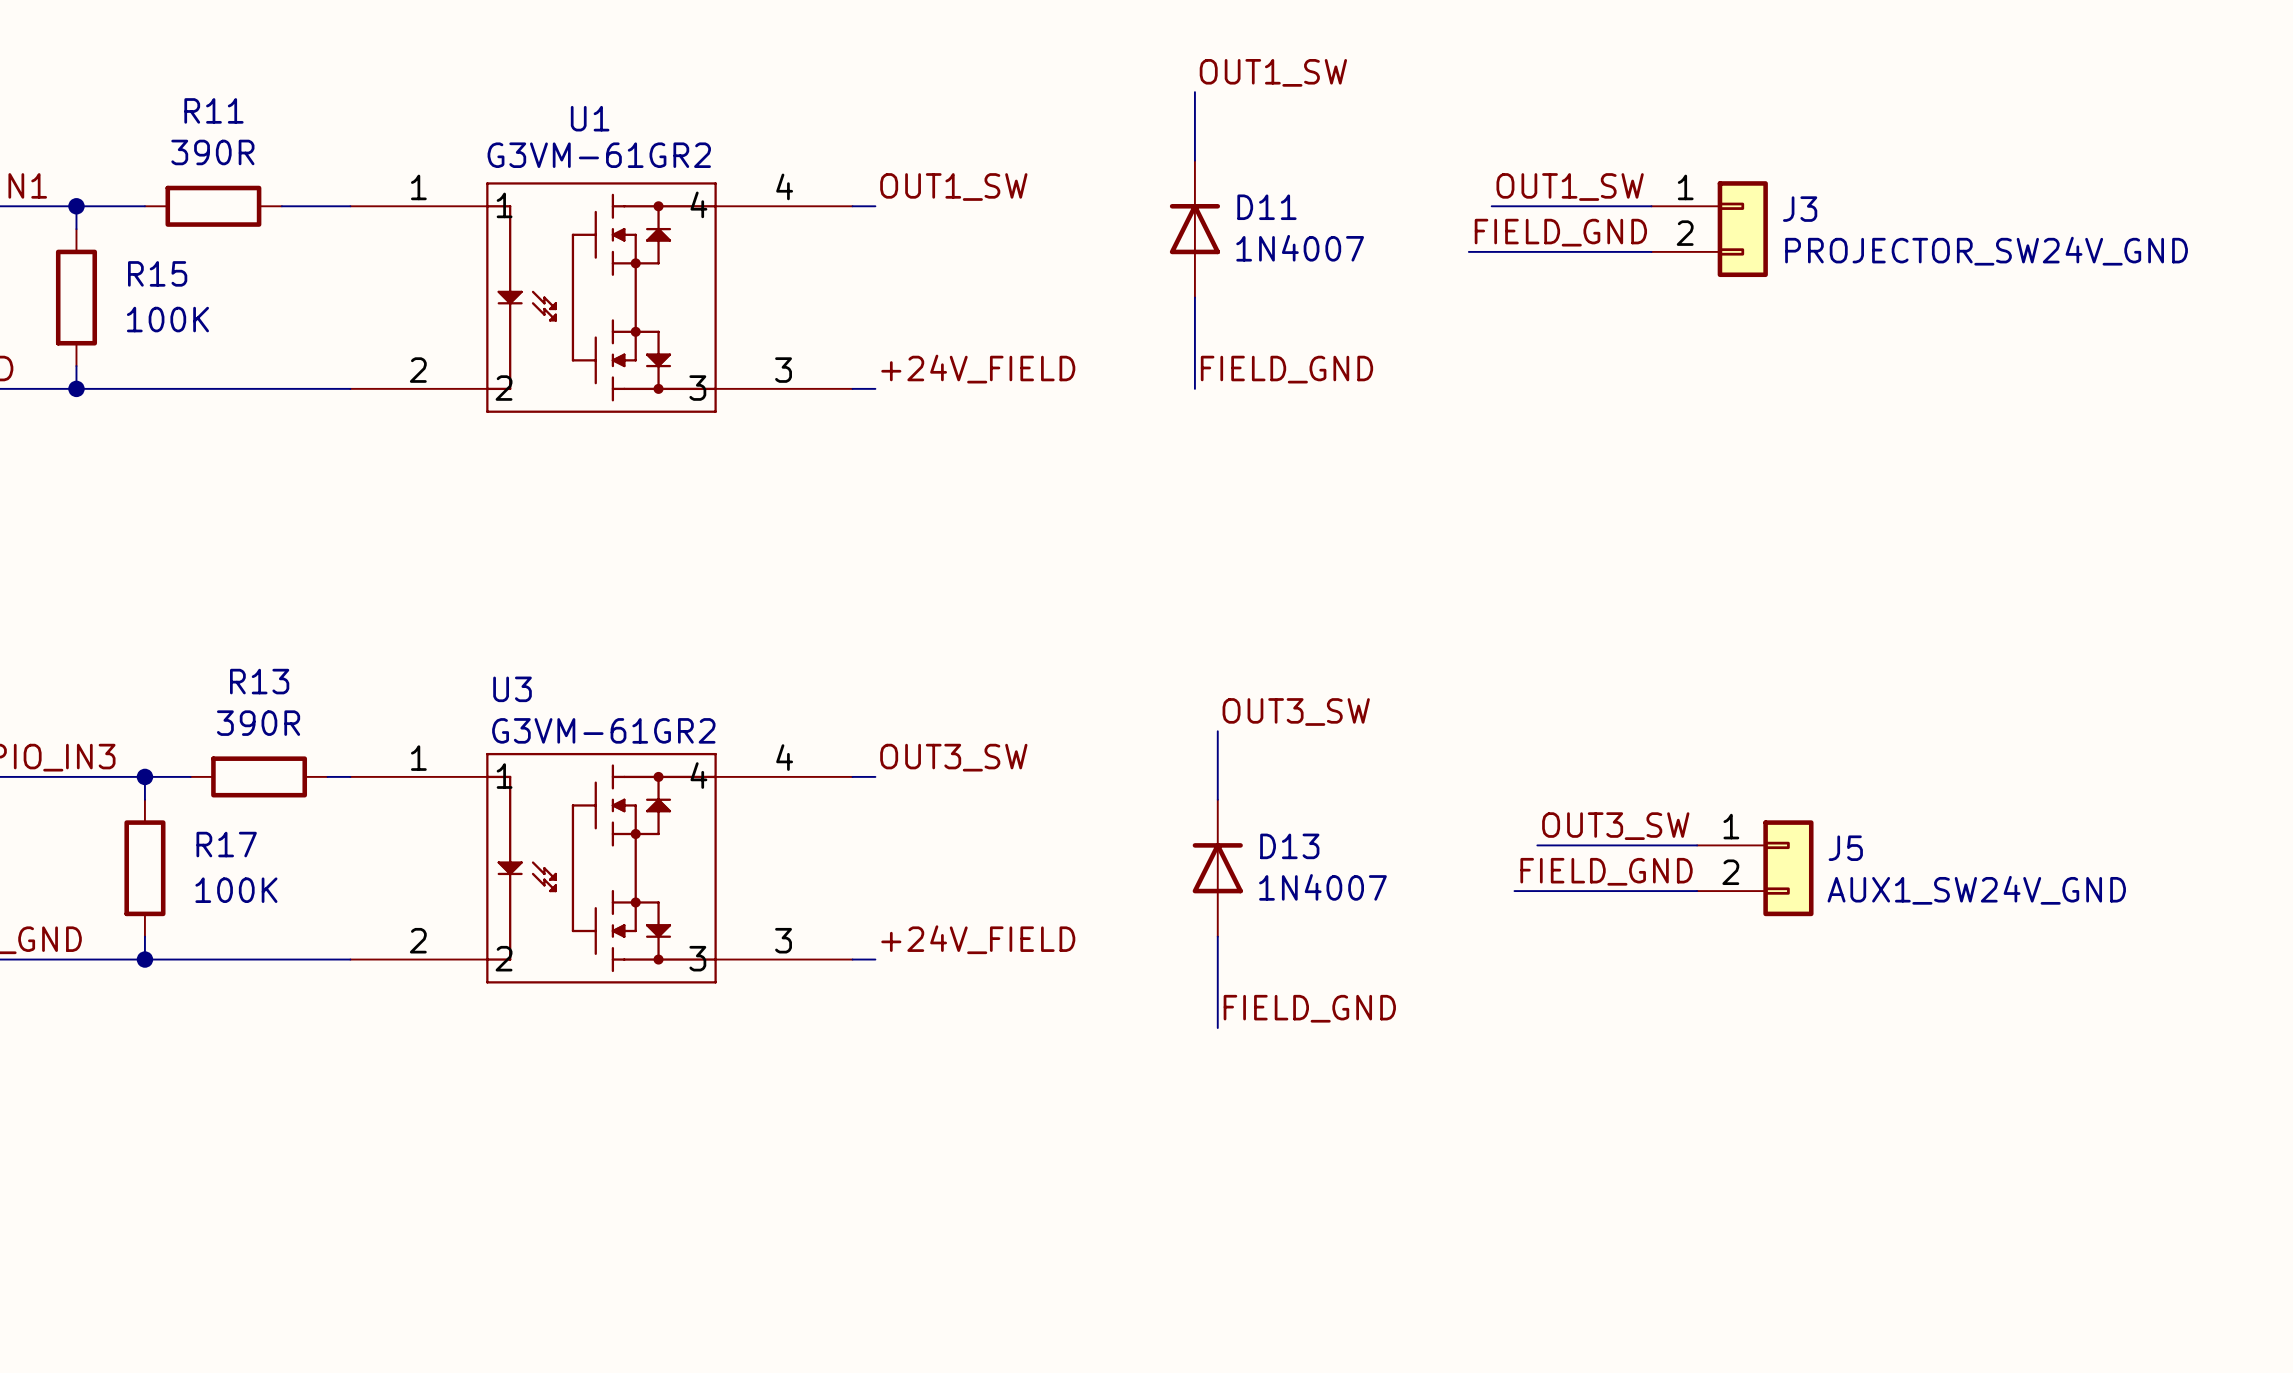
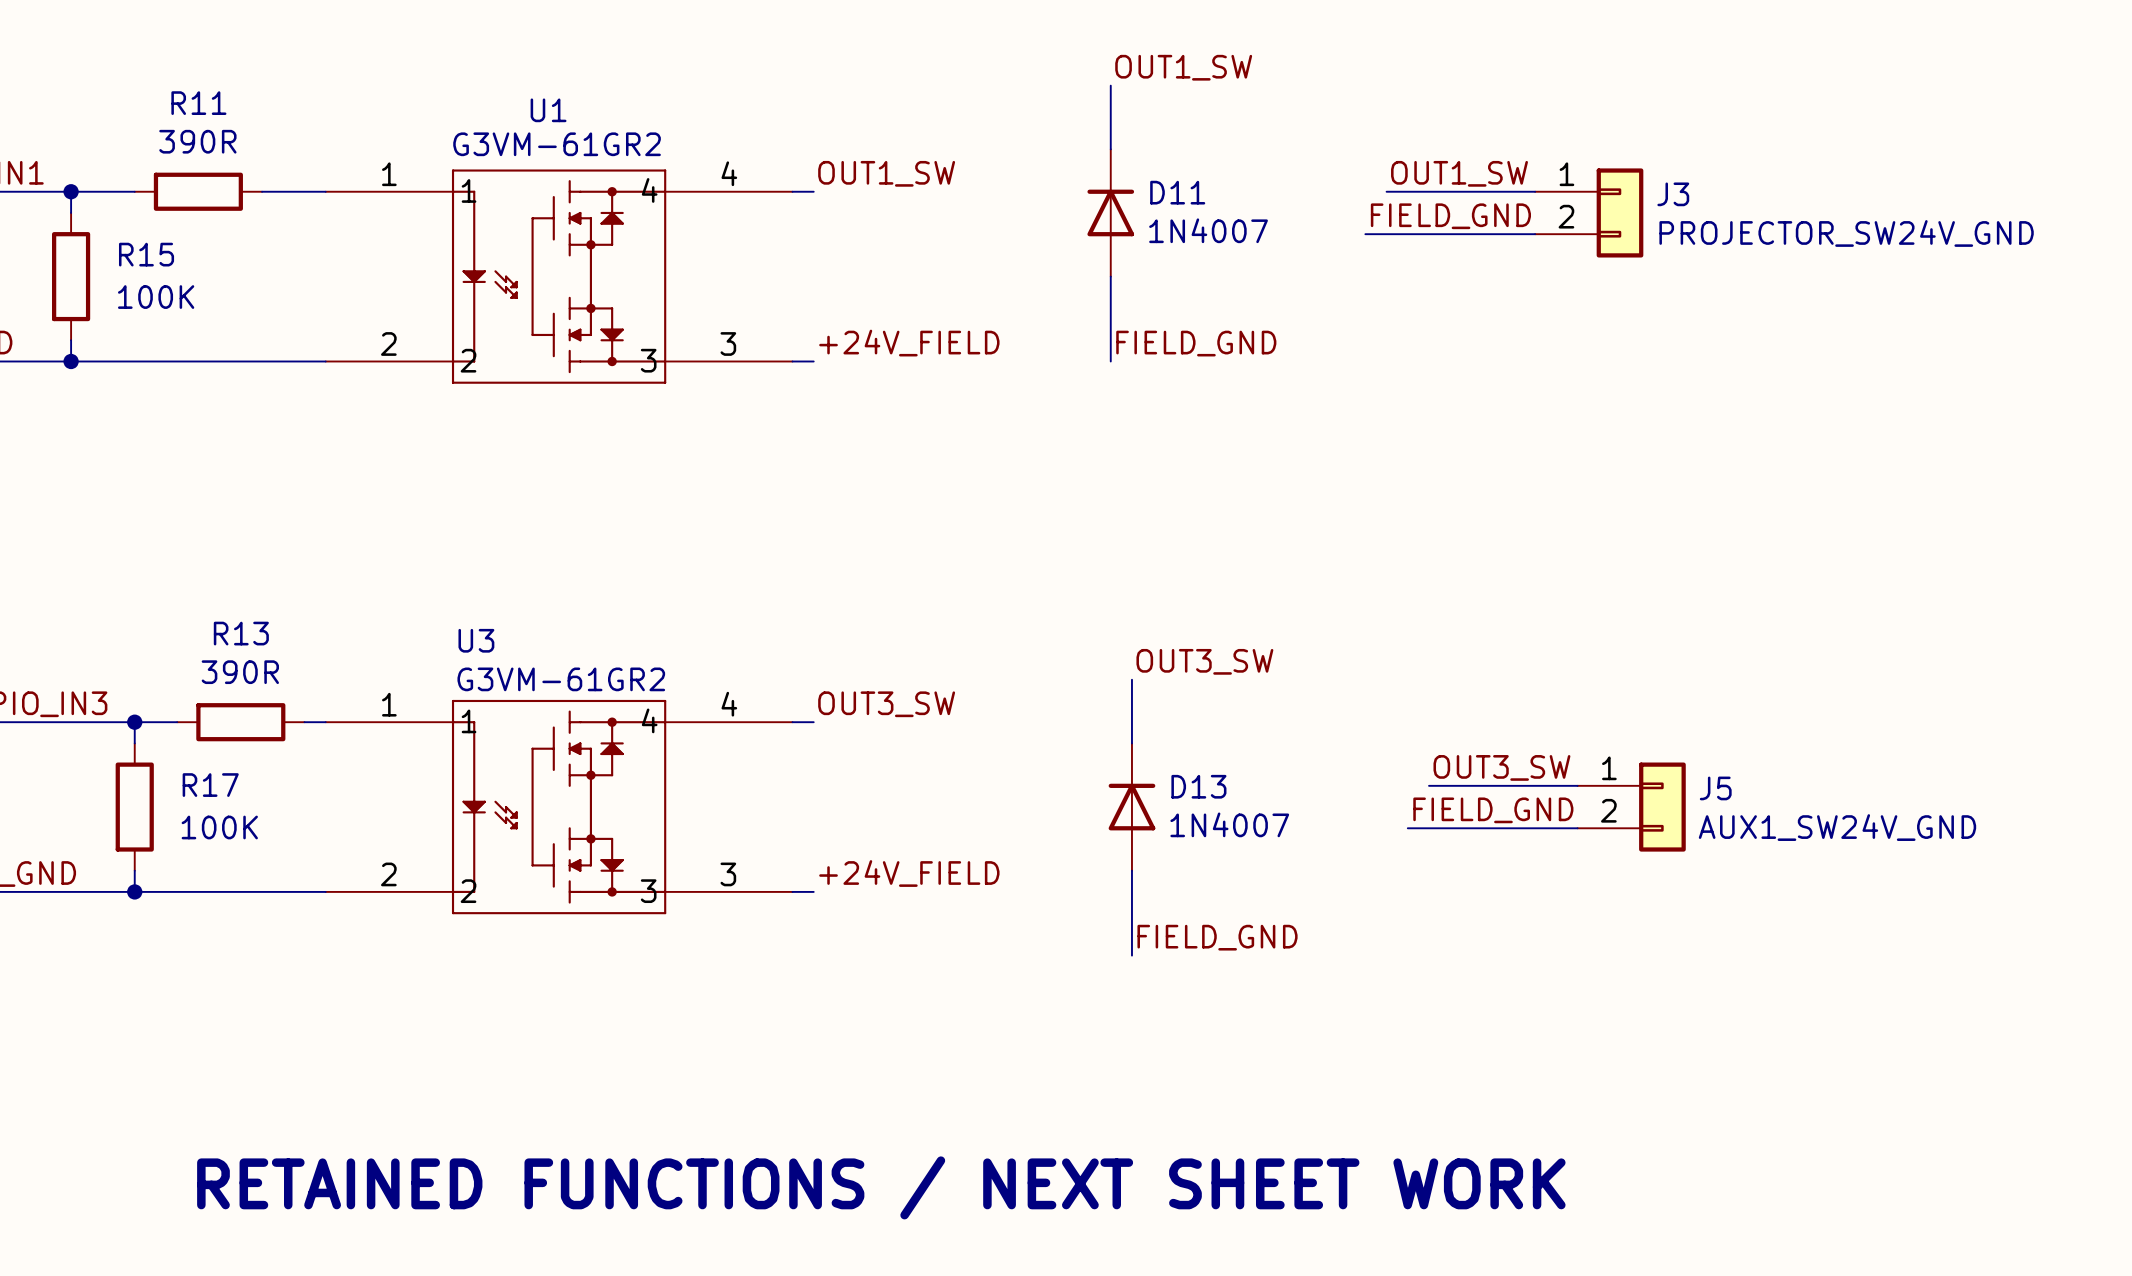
text: none -> RETAINED FUNCTIONS / NEXT SHEET WORK (881, 1187)

